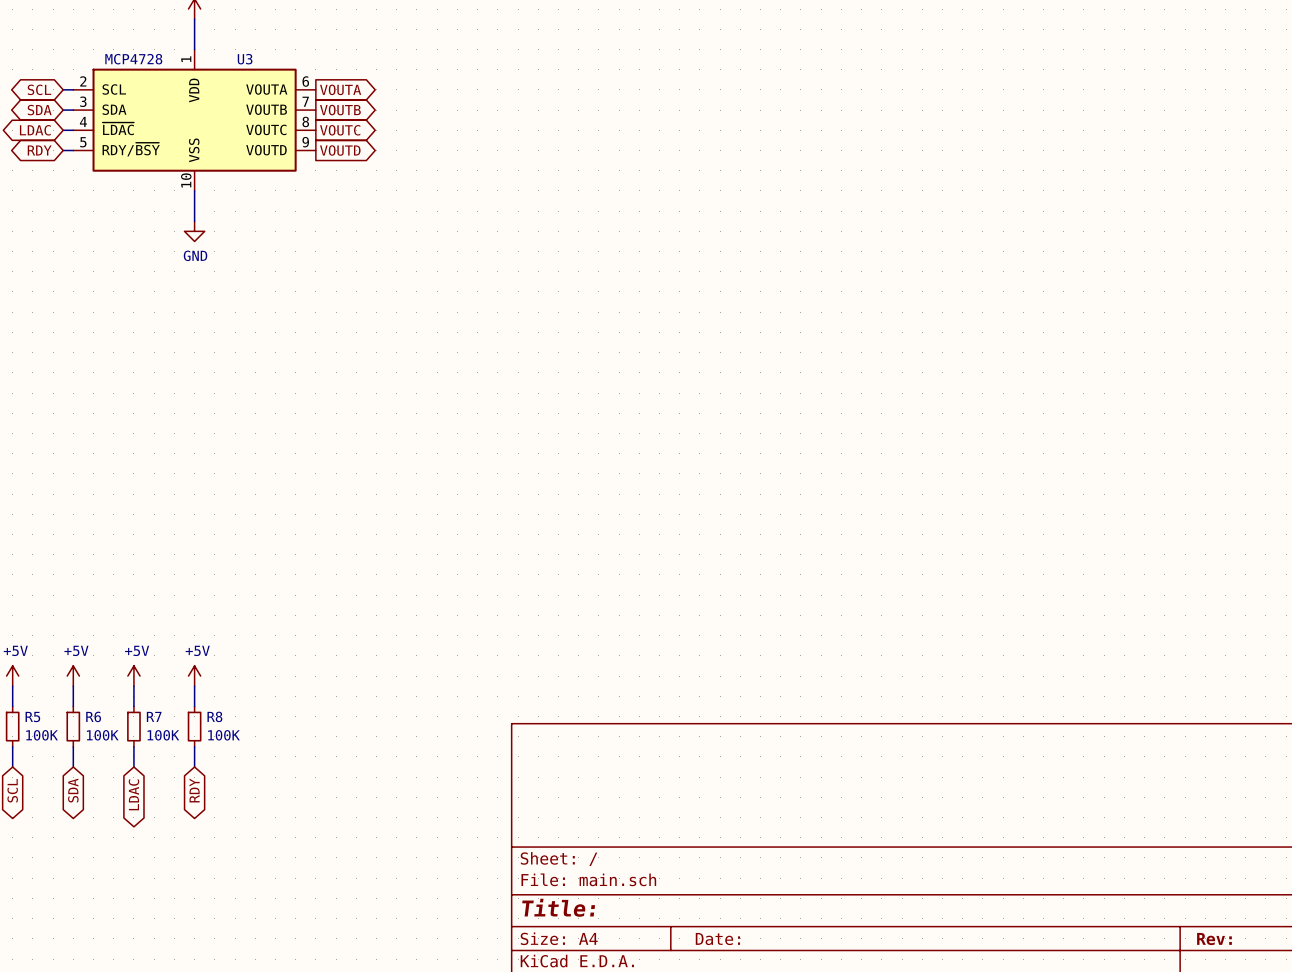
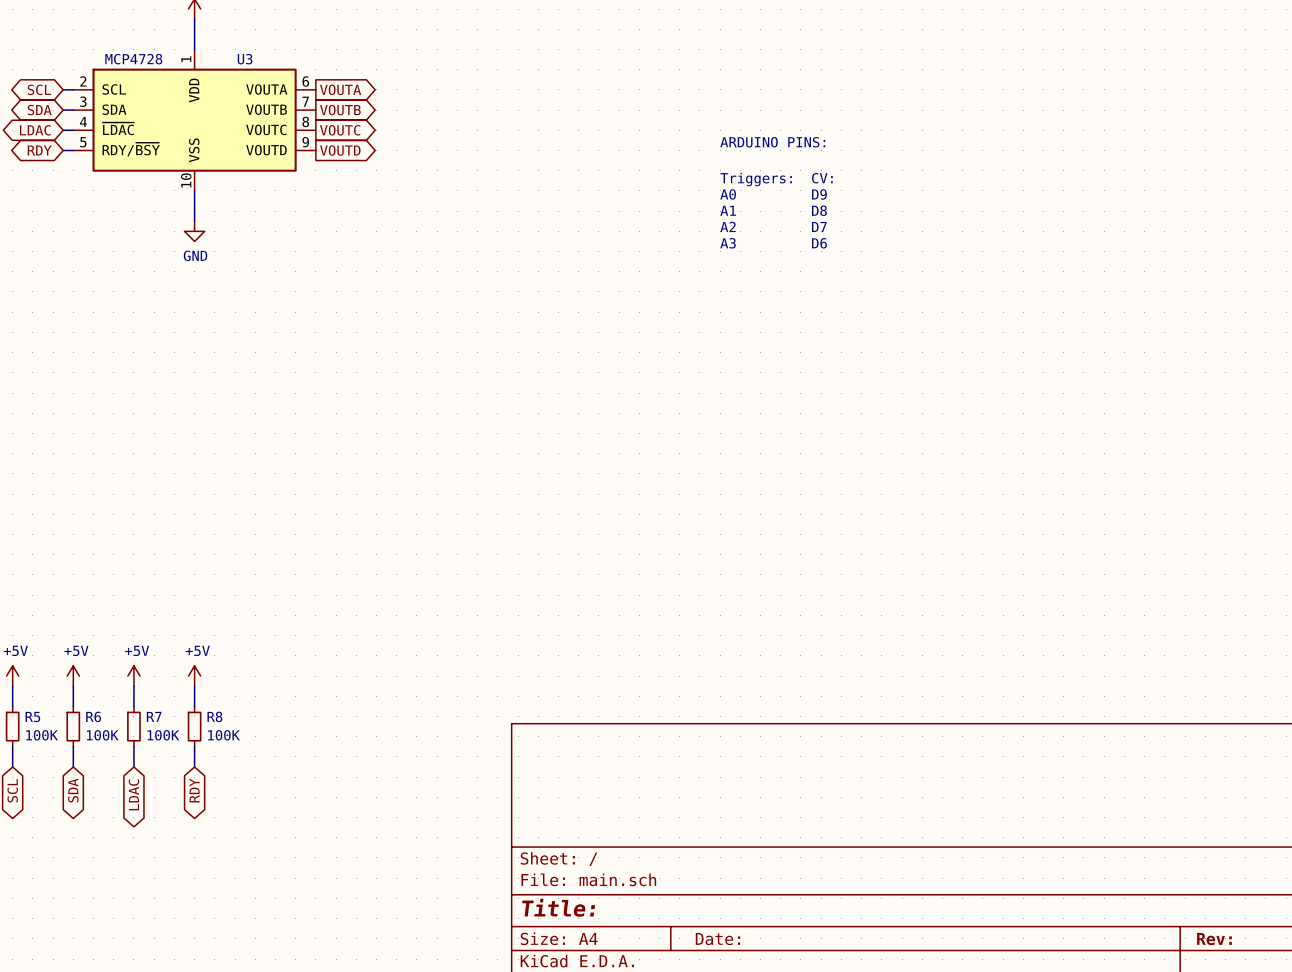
text: none -> ARDUINO PINS: (772, 142)
text: none -> CV: (822, 178)
text: none -> Triggers: (756, 179)
text: none -> A0 (728, 194)
text: none -> D9 (819, 194)
text: none -> A1 (728, 210)
text: none -> D8 (819, 210)
text: none -> A2 (728, 226)
text: none -> D7 (819, 227)
text: none -> A3 (728, 243)
text: none -> D6 (819, 243)

